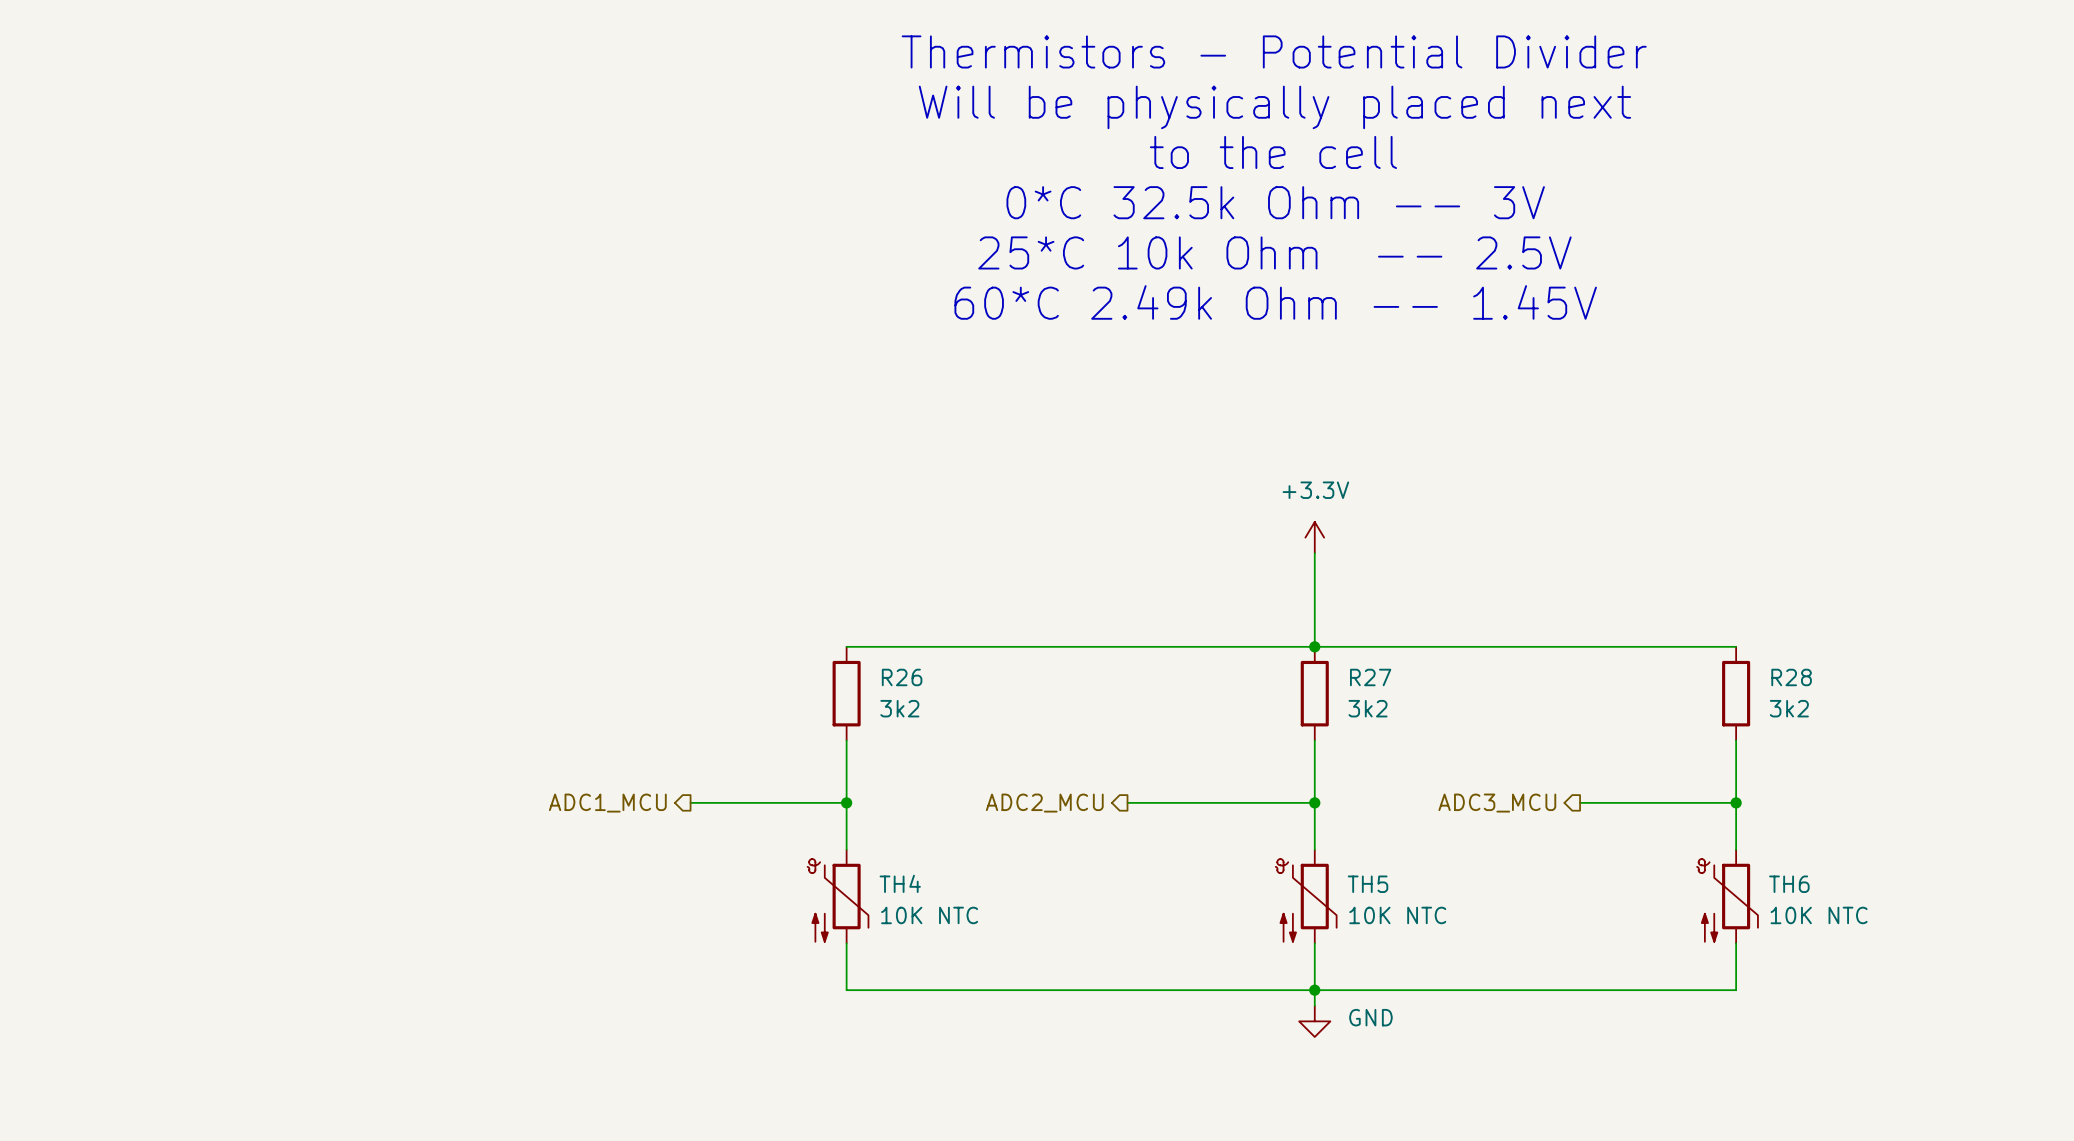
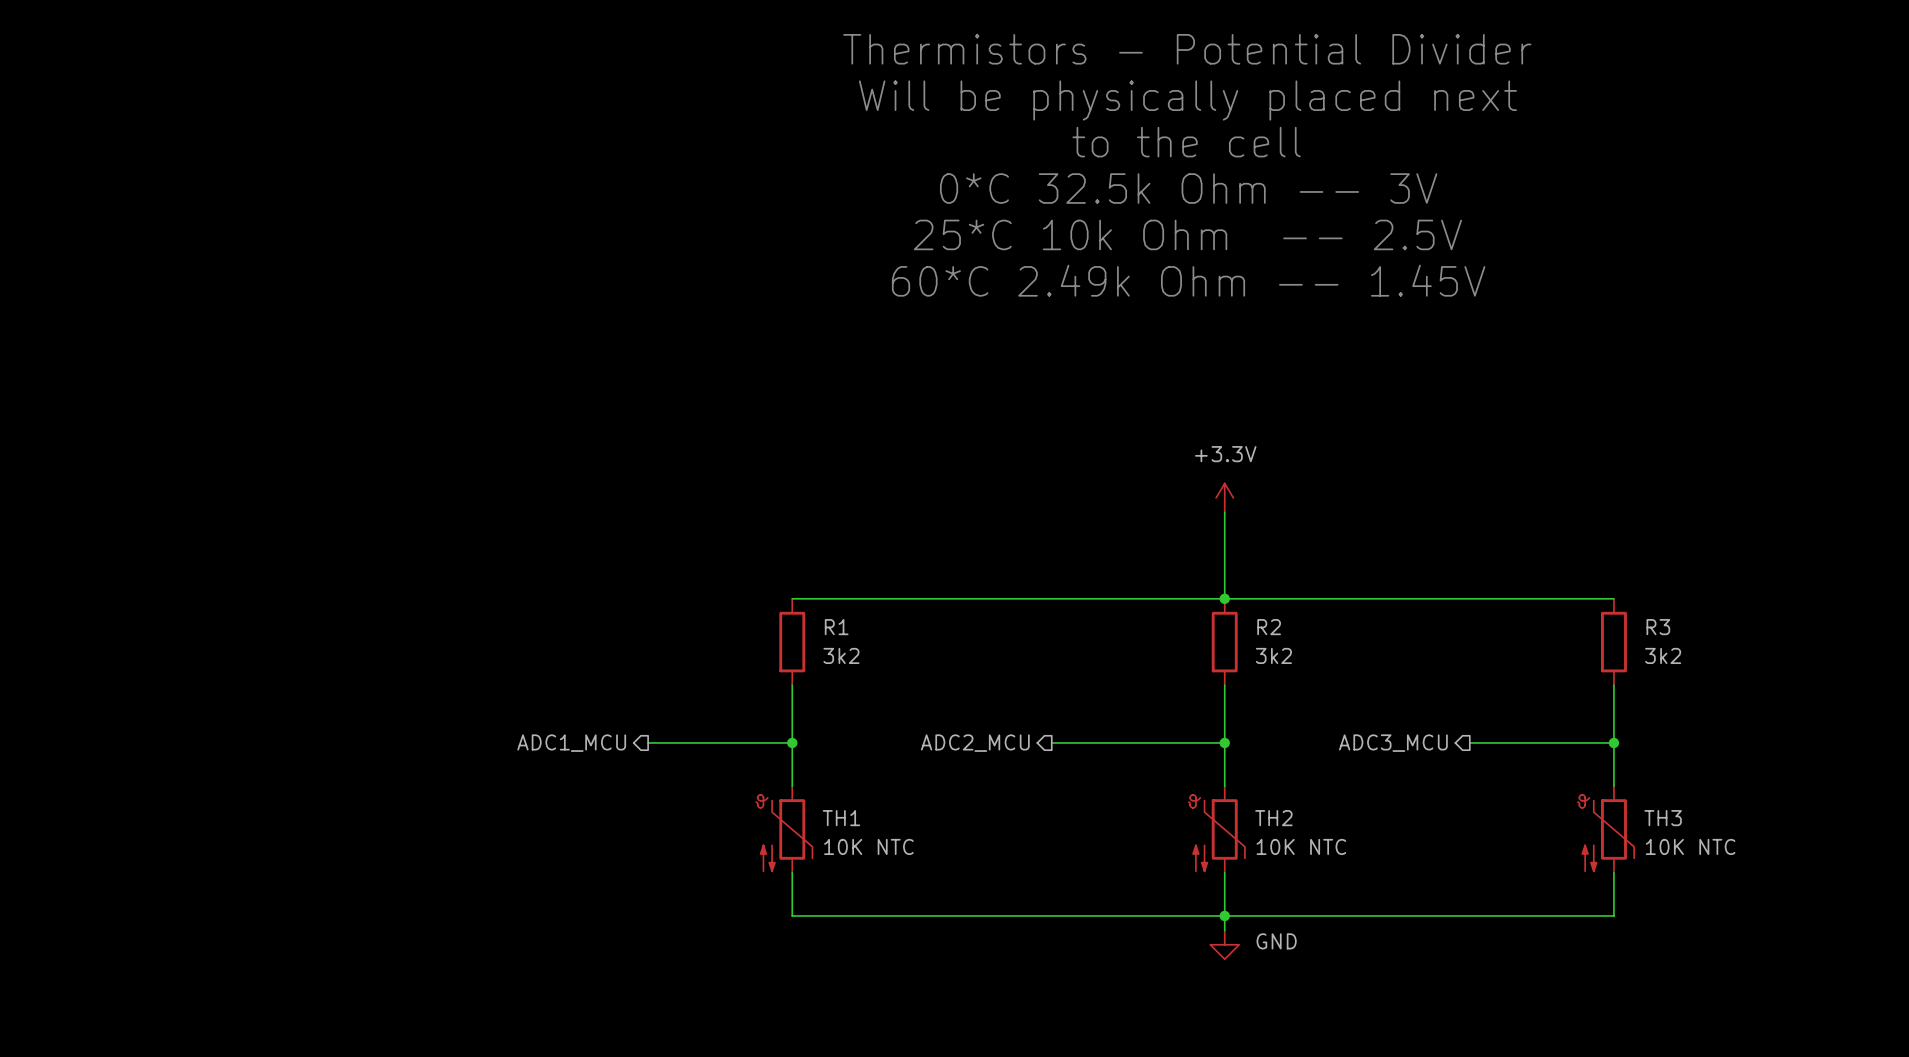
R26 name: R26 (902, 677) -> R1 (836, 627)
R27 name: R27 (1370, 677) -> R2 (1269, 627)
R28 name: R28 (1791, 677) -> R3 (1658, 627)
TH4 name: TH4 (900, 883) -> TH1 (841, 818)
TH5 name: TH5 (1368, 884) -> TH2 (1273, 818)
TH6 name: TH6 (1789, 884) -> TH3 (1663, 818)

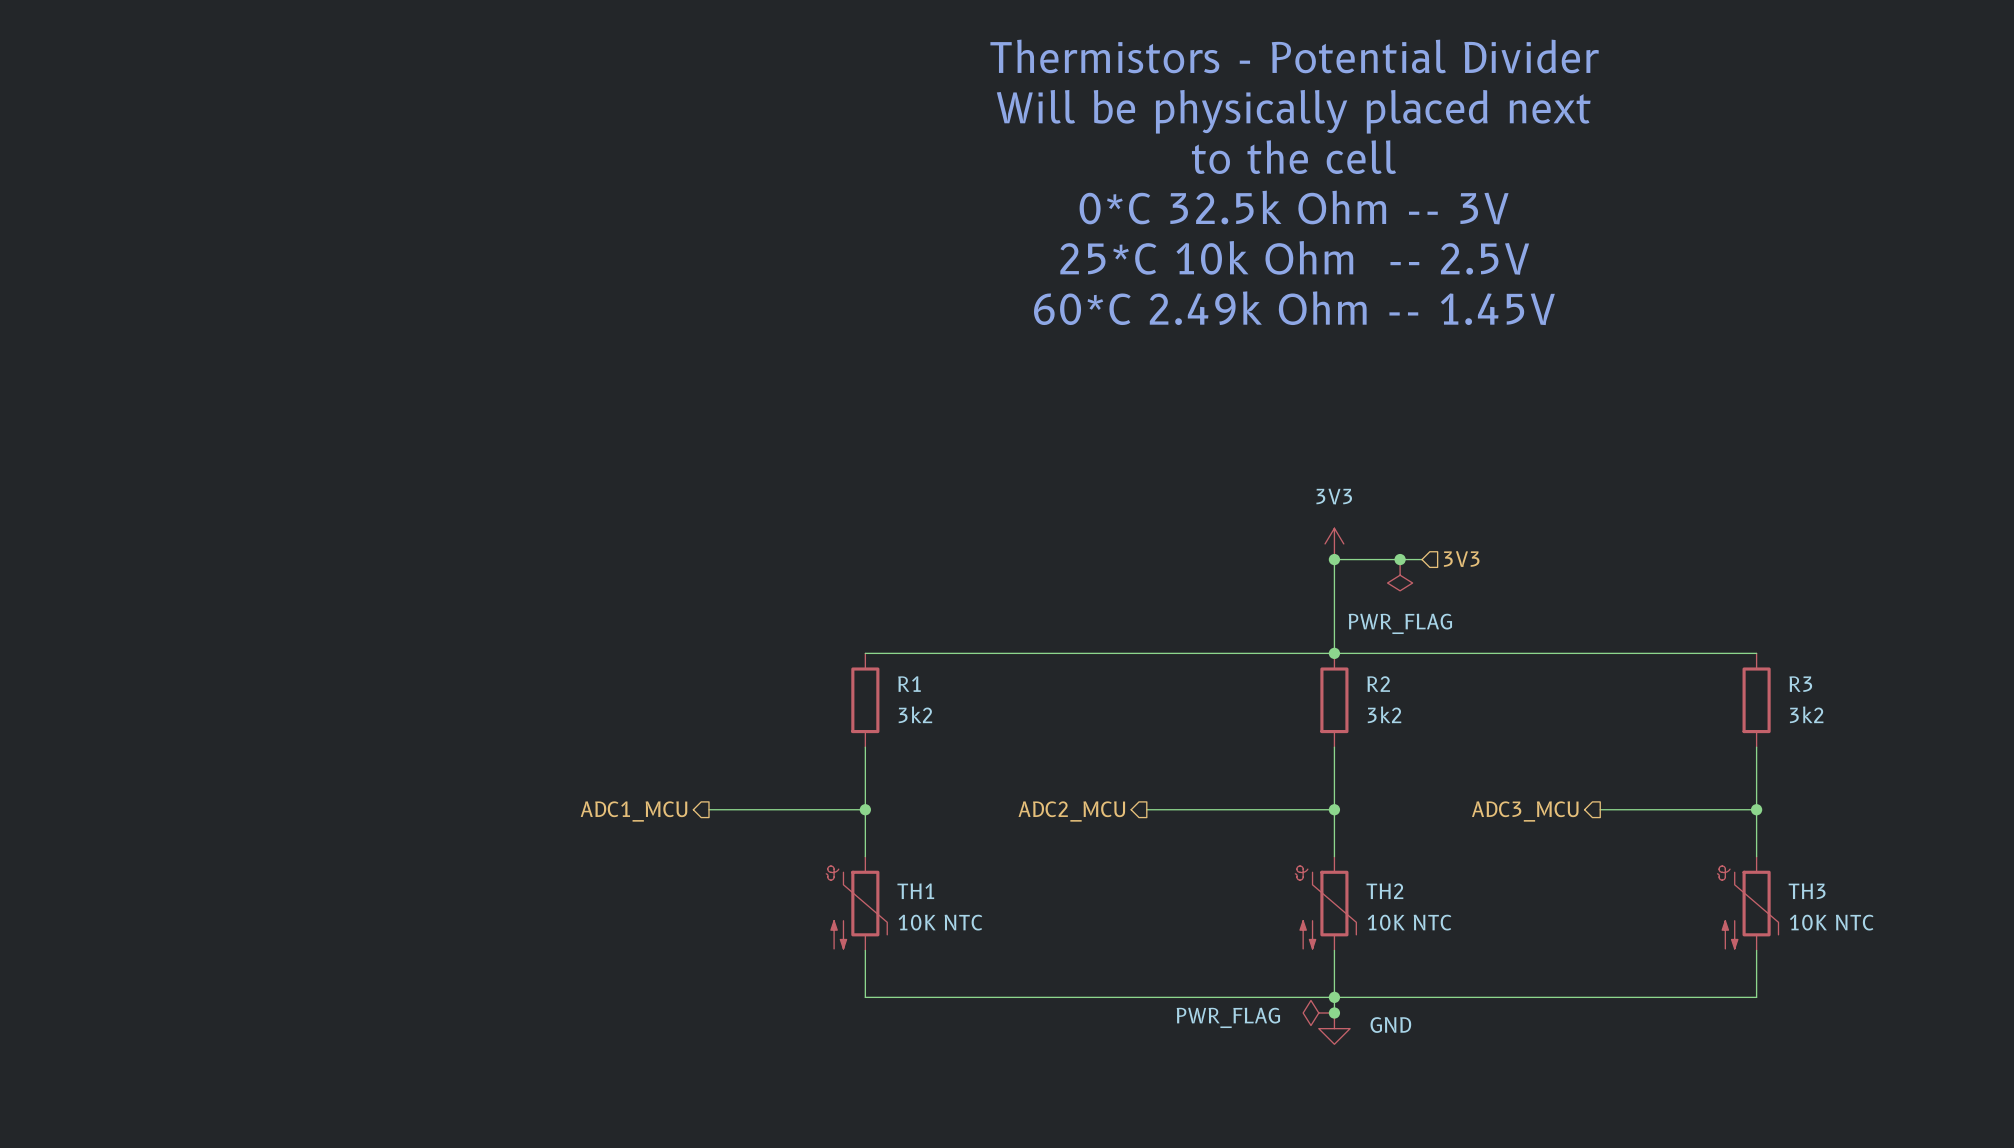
power symbol: +3.3V (1224, 497) -> 3V3 (1334, 543)
hierarchical label: none -> 3V3 (1461, 559)
wire: none -> (1334, 559) (1421, 559)
junction: none -> (1334, 559)
junction: none -> (1400, 559)
power symbol: none -> PWR_FLAG (1400, 575)
power symbol: none -> PWR_FLAG (1318, 1013)
junction: none -> (1334, 1013)

